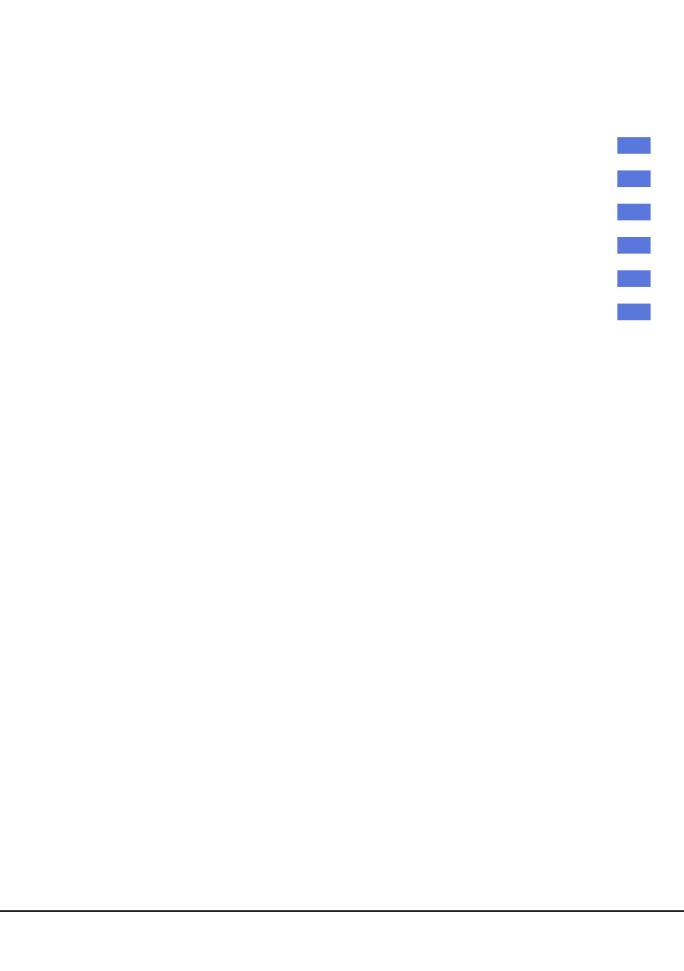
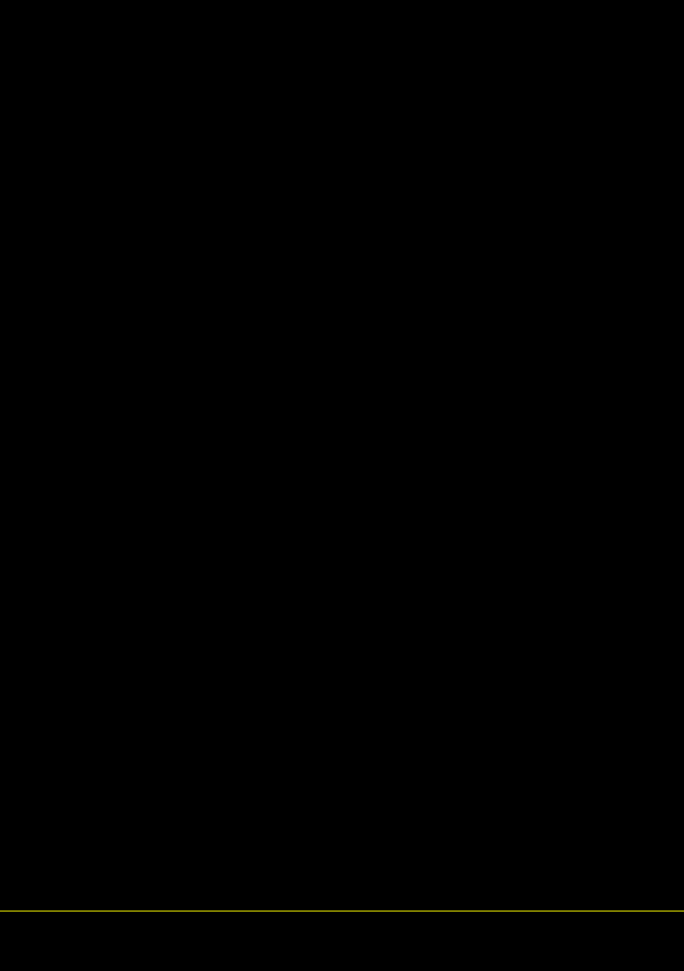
part: (633, 145) -> none
part: (633, 178) -> none
part: (633, 212) -> none
part: (633, 245) -> none
part: (633, 278) -> none
part: (633, 311) -> none

